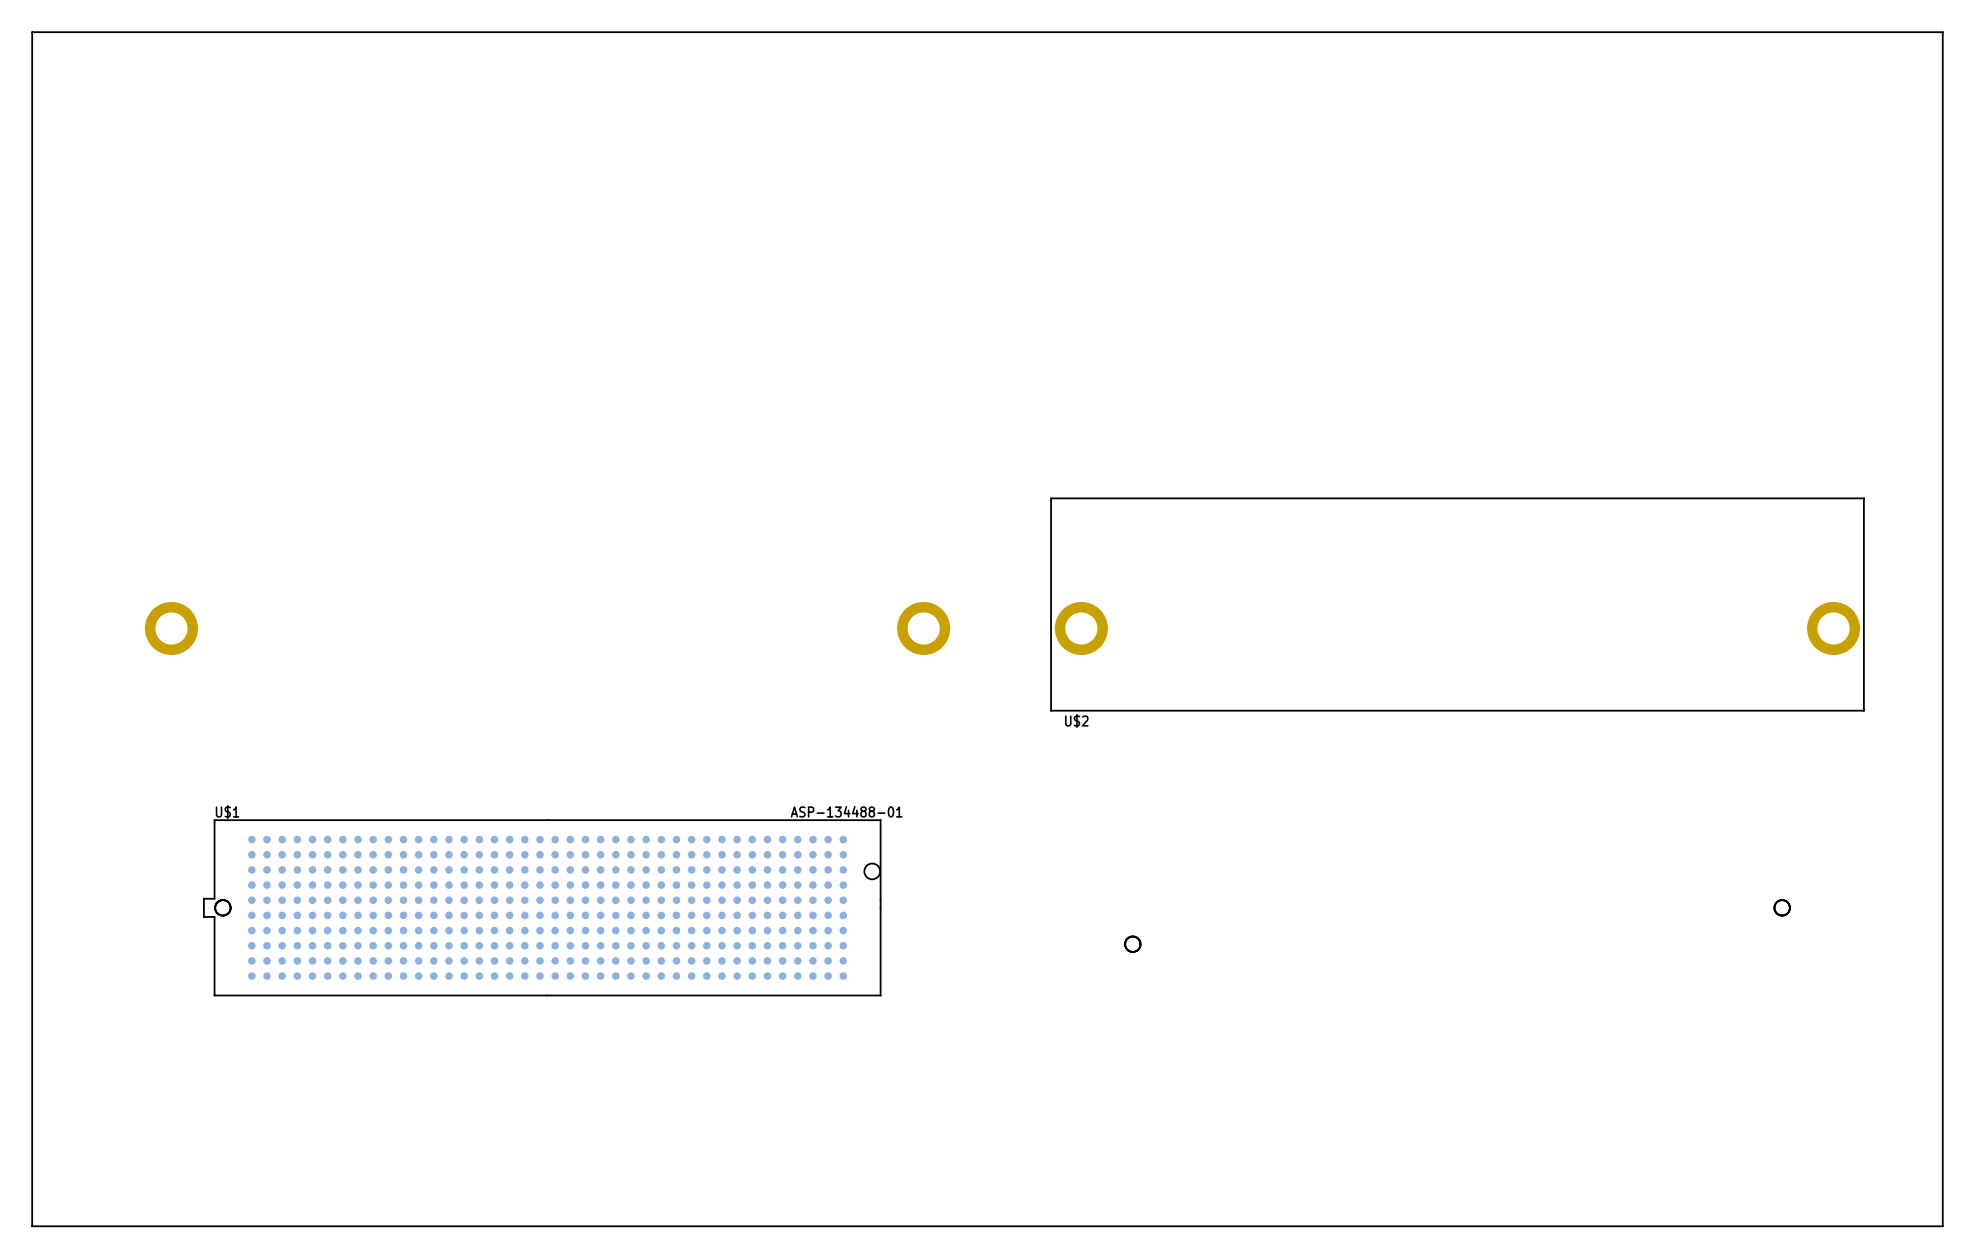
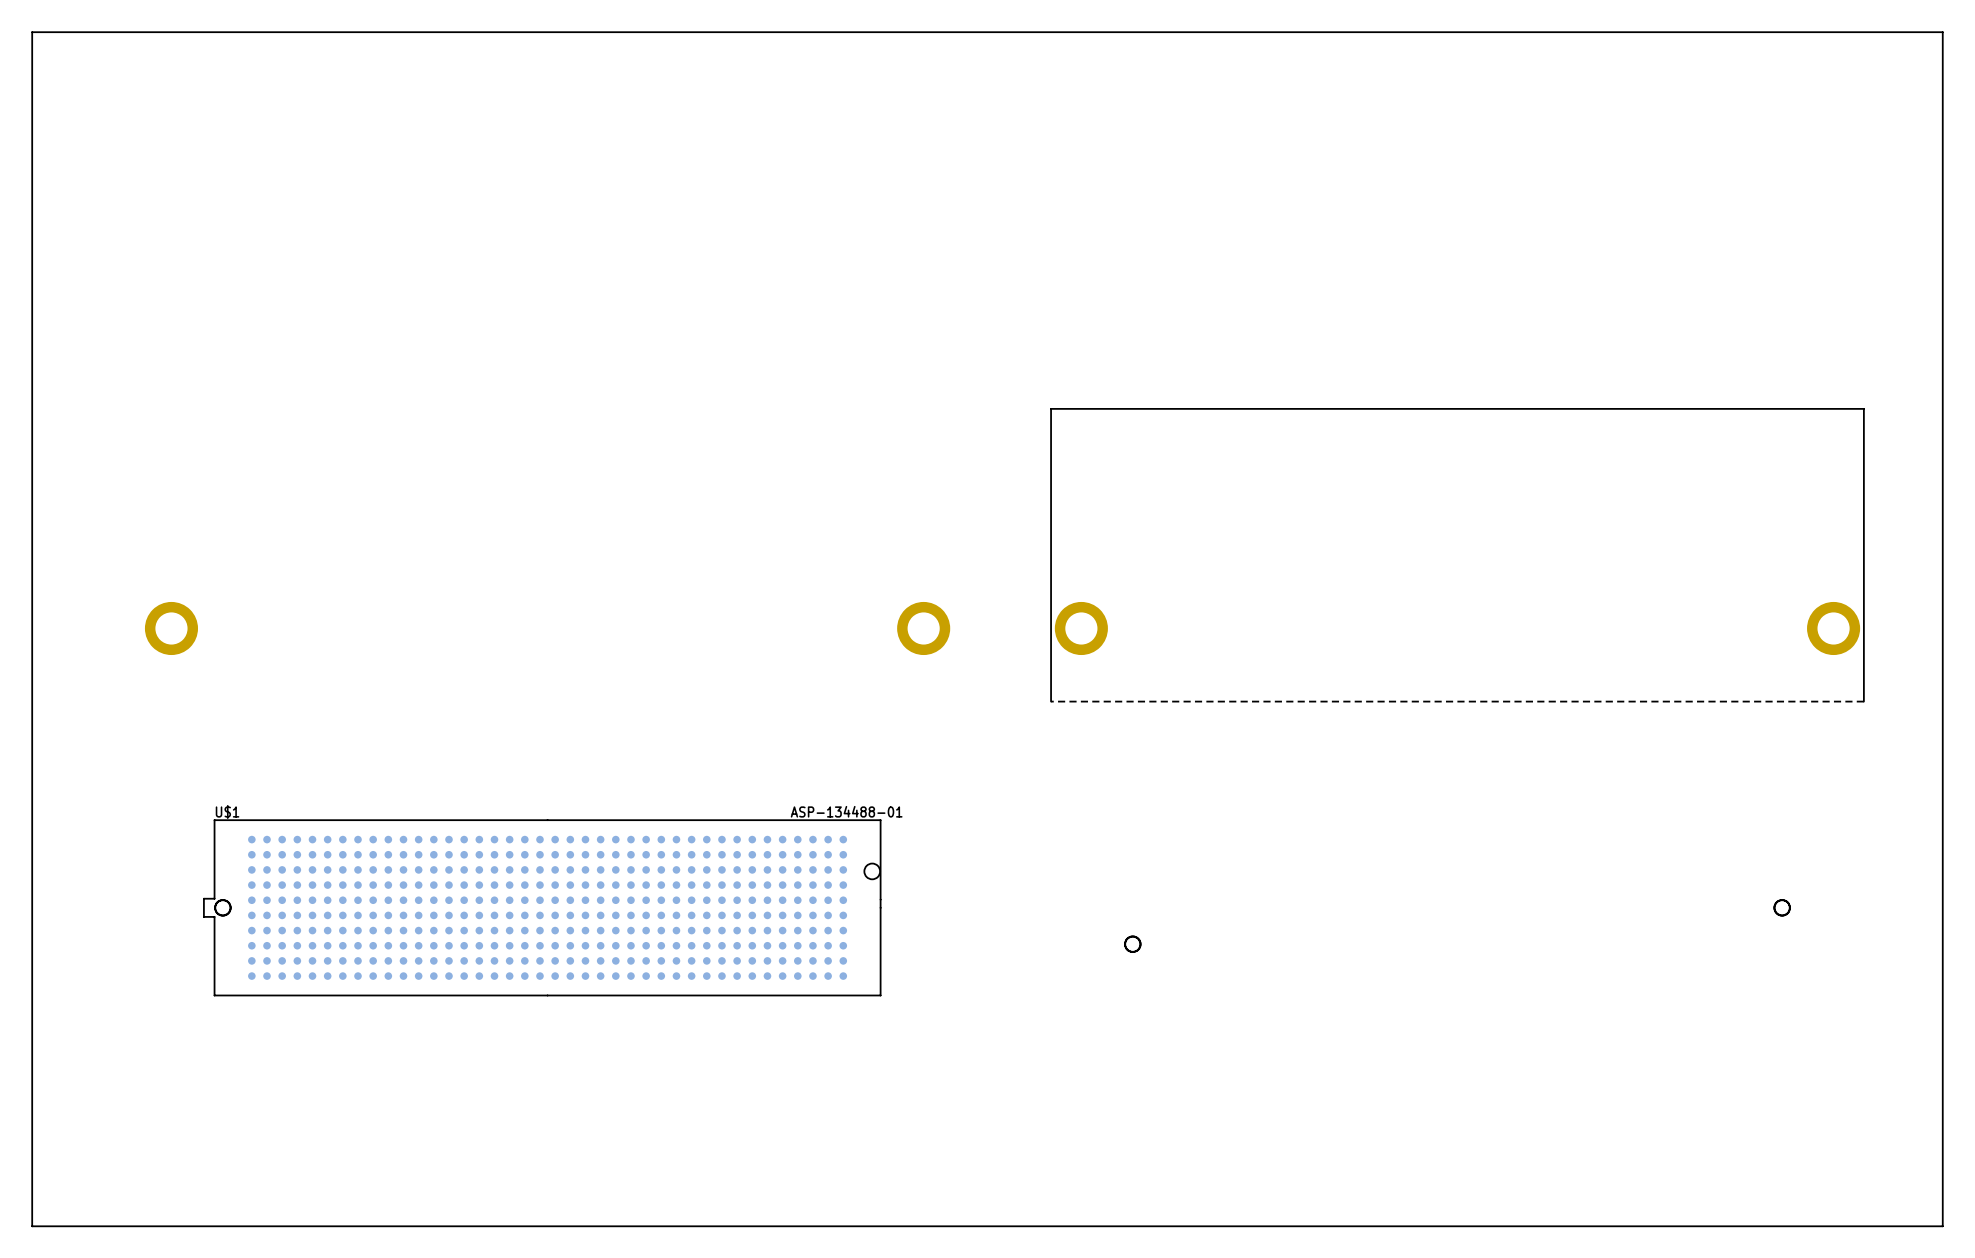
part: none -> (1457, 555)
U$2: (1457, 604) -> none

